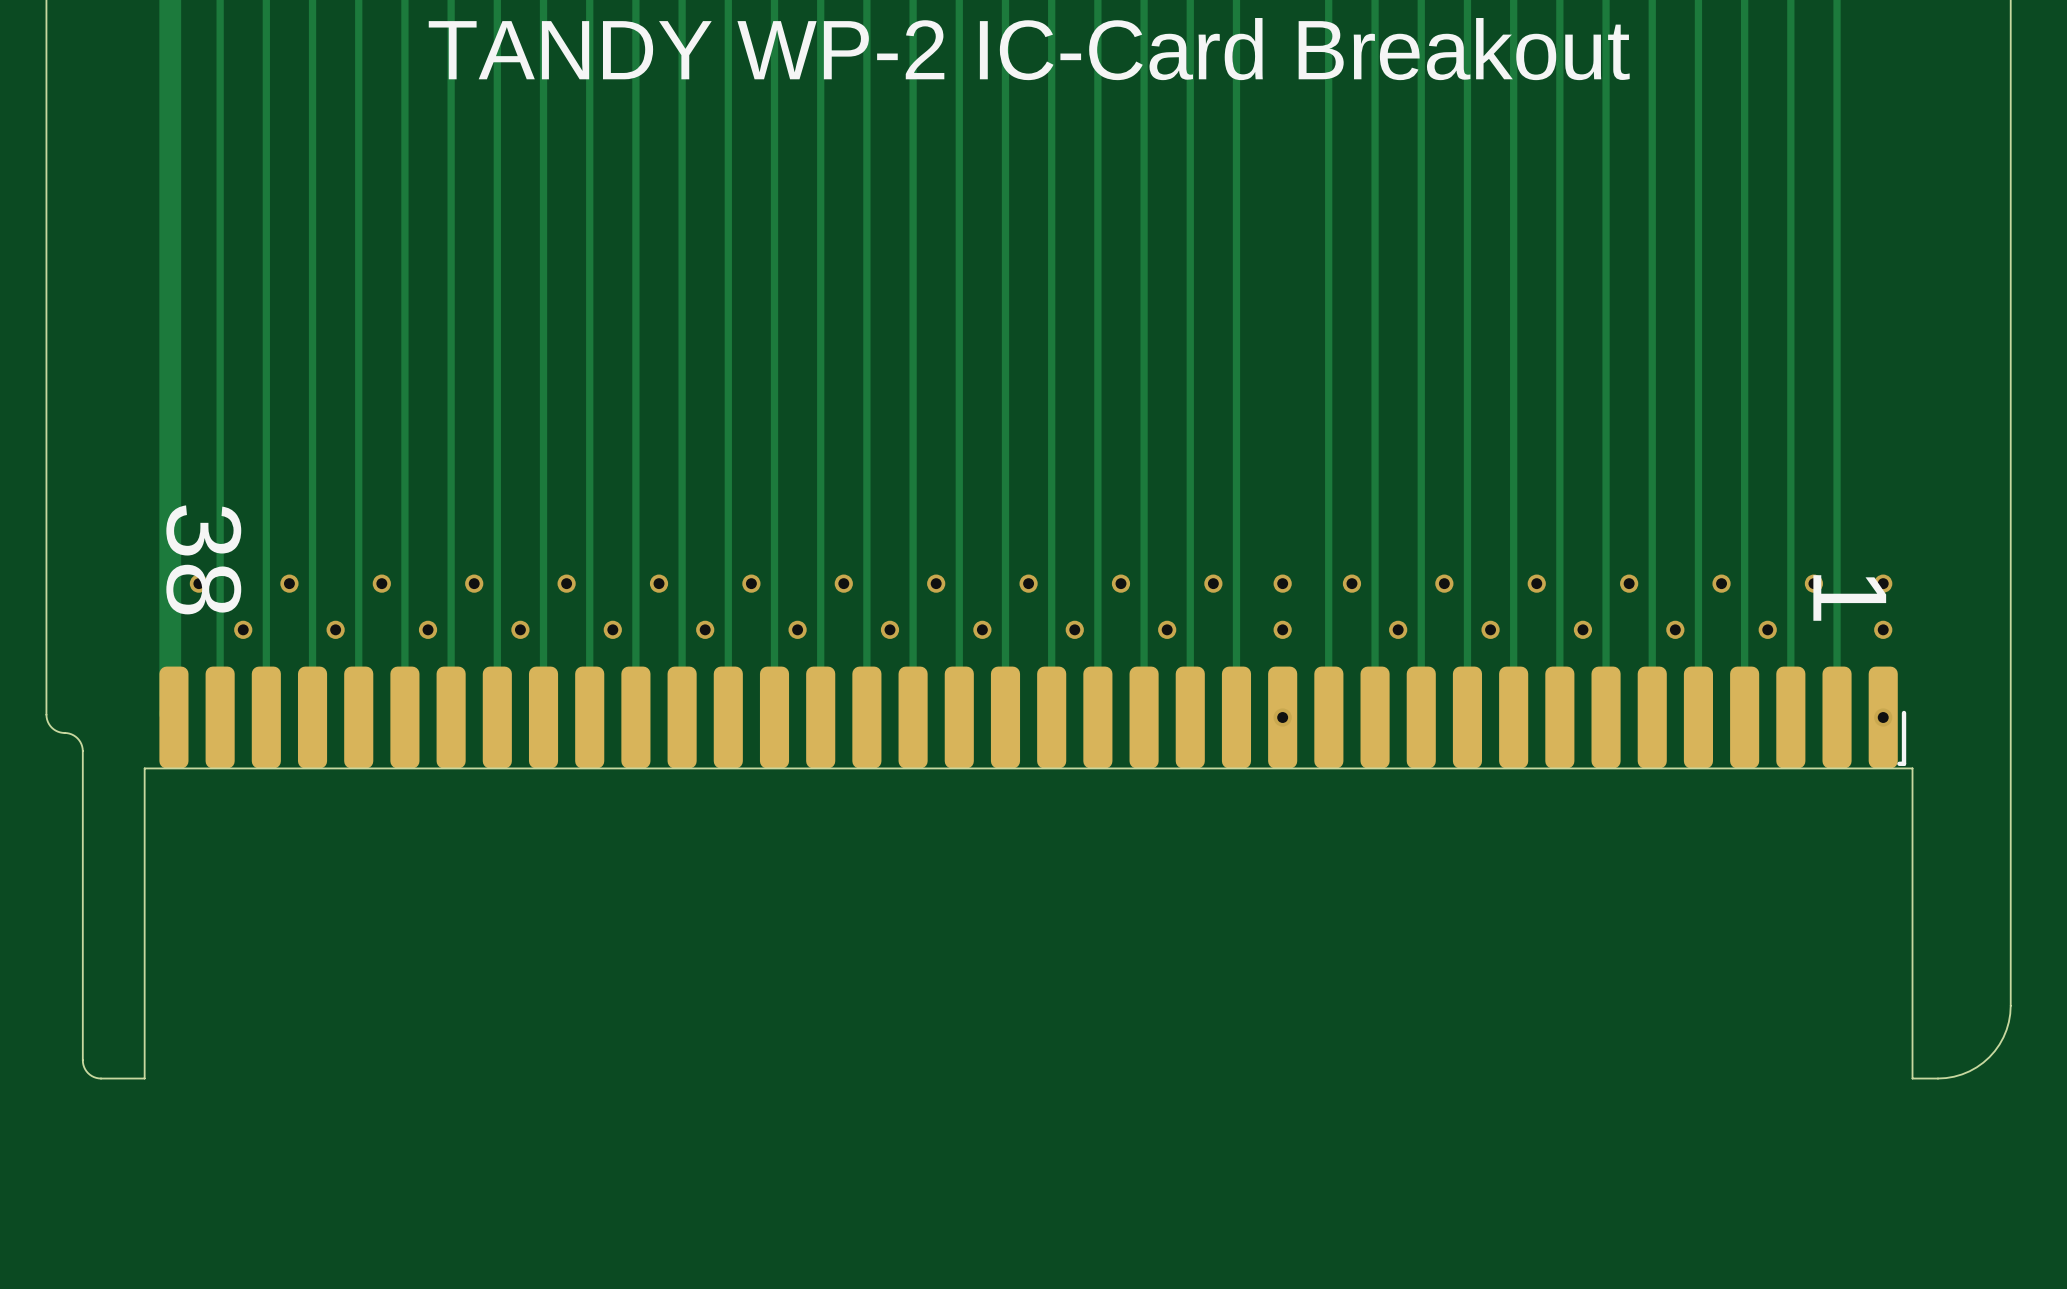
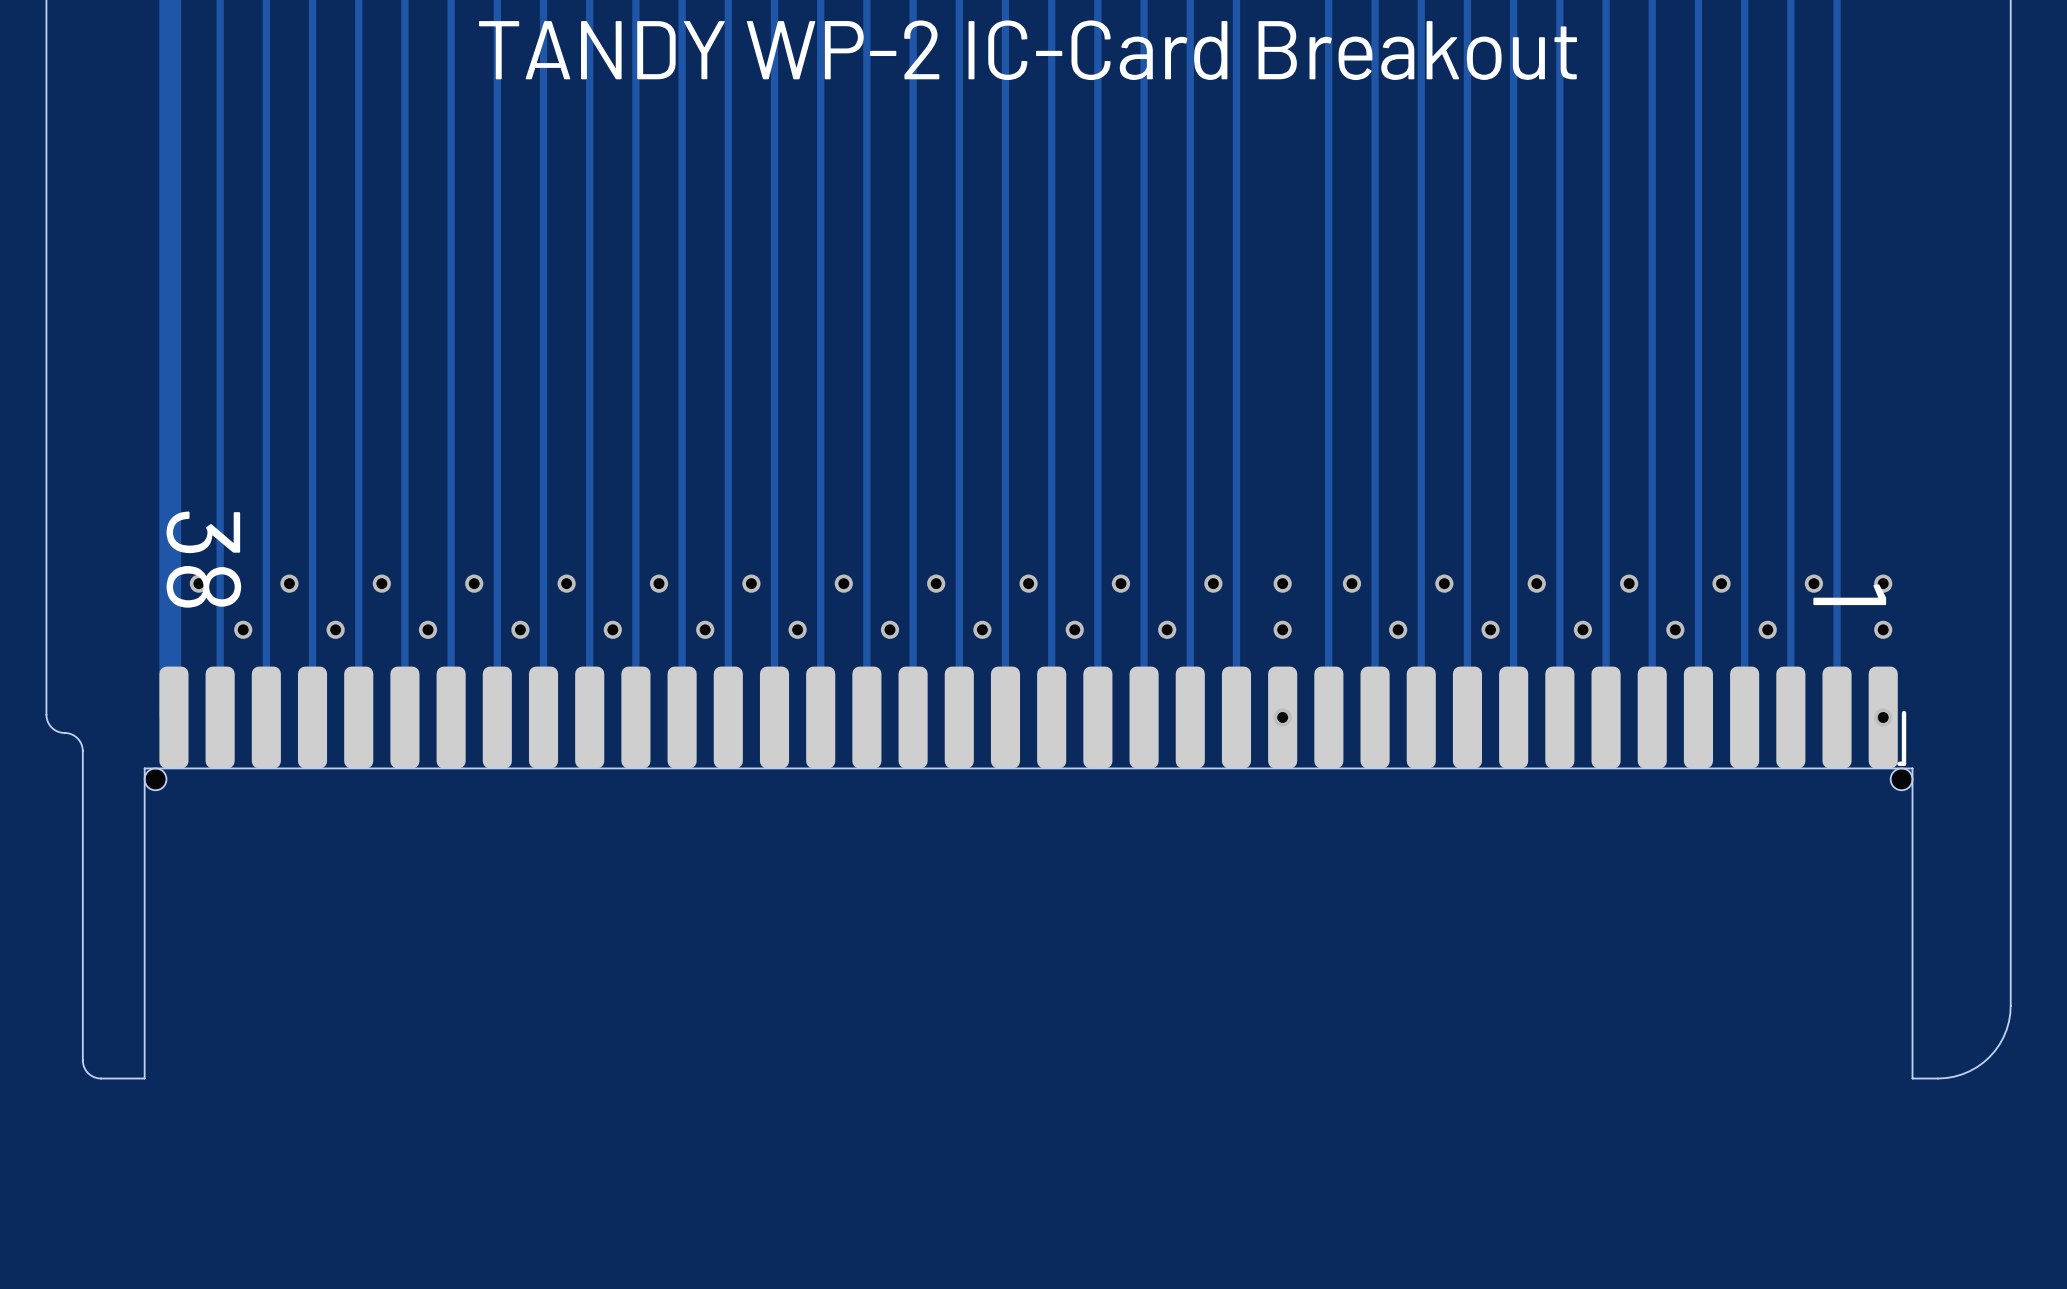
part: none -> (155, 779)
part: none -> (1901, 779)

